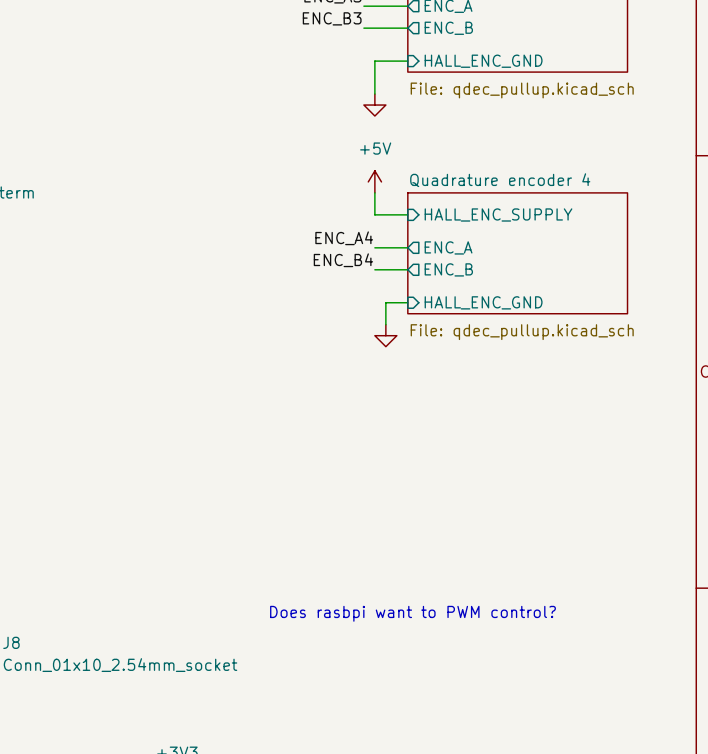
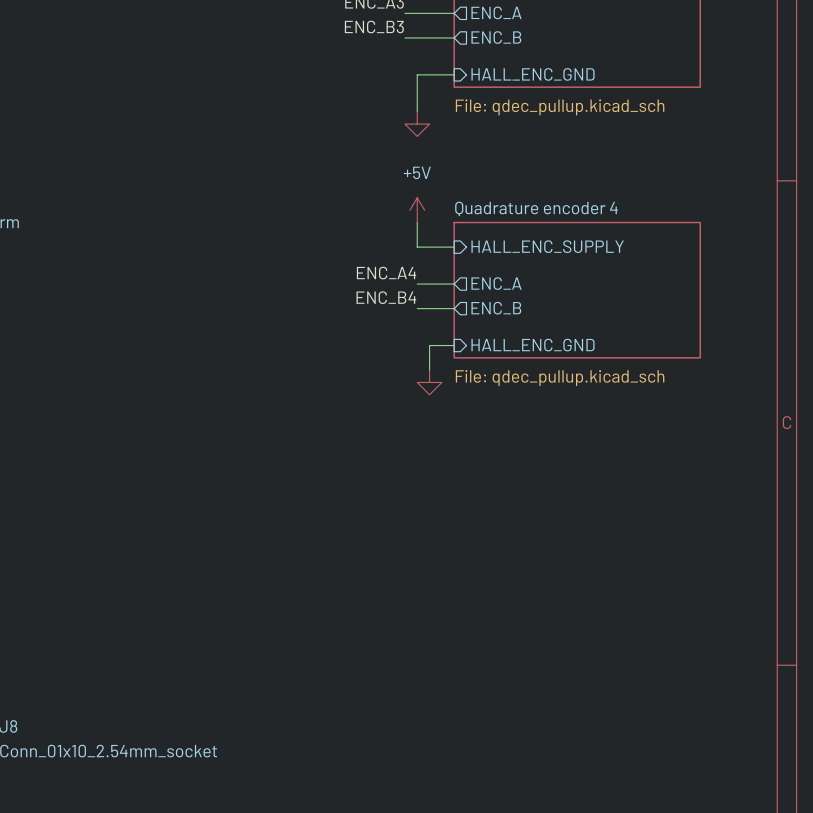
text: Does rasbpi want to PWM control? (412, 613) -> none

